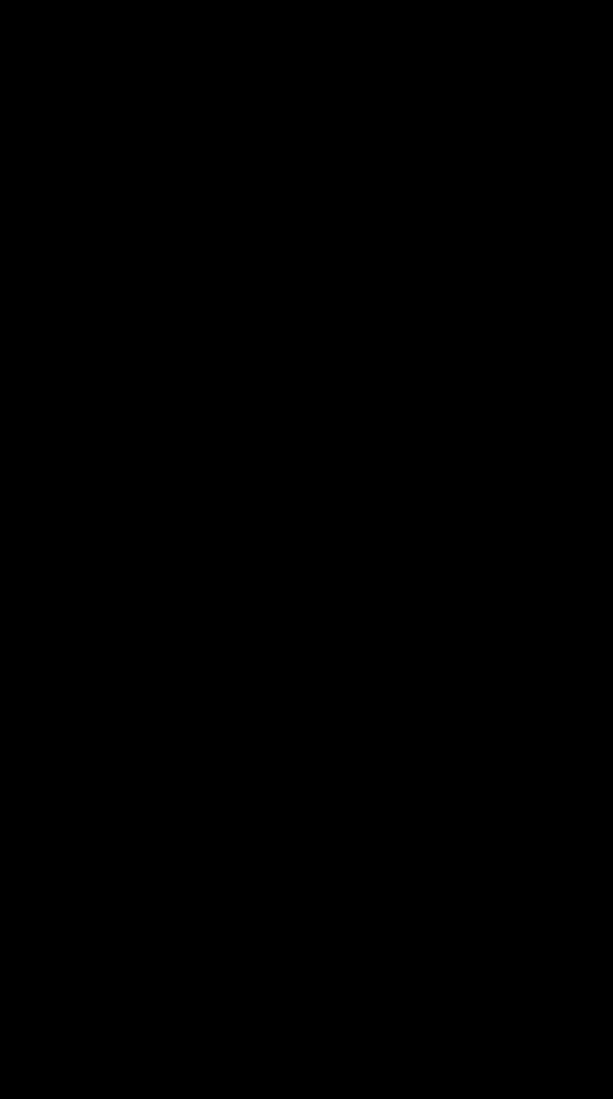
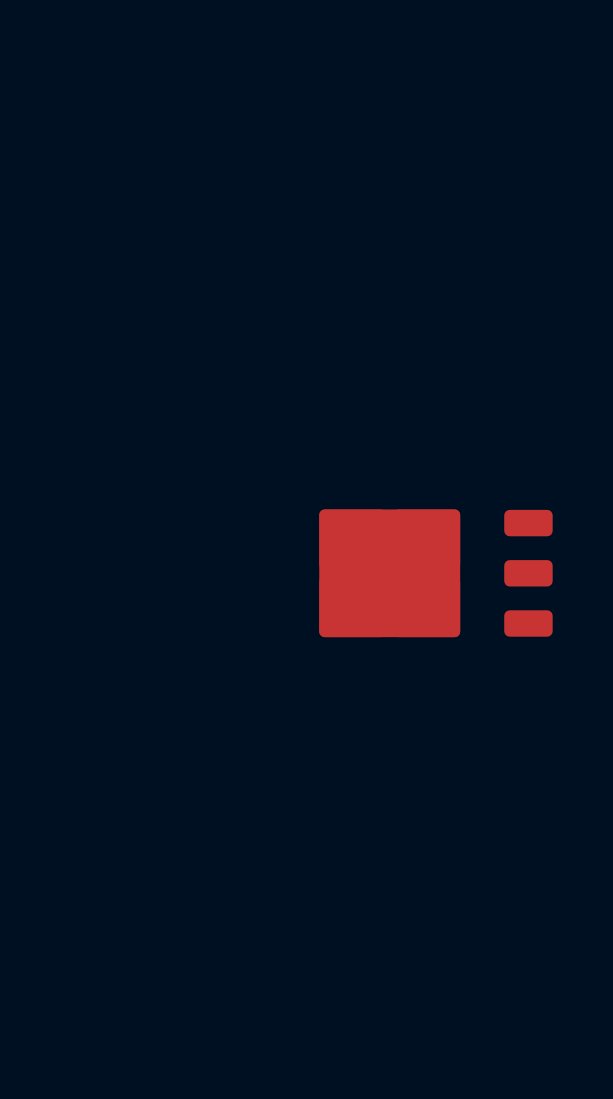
part: none -> (435, 573)

